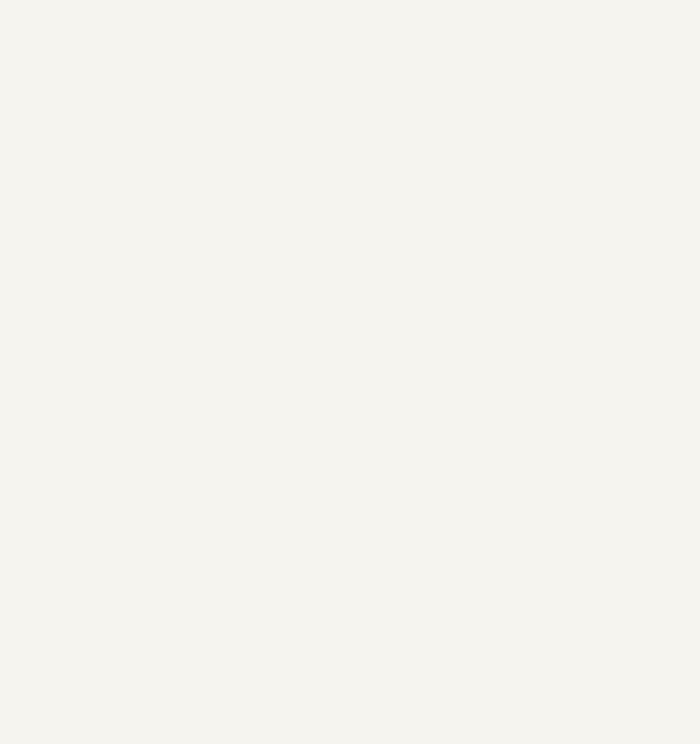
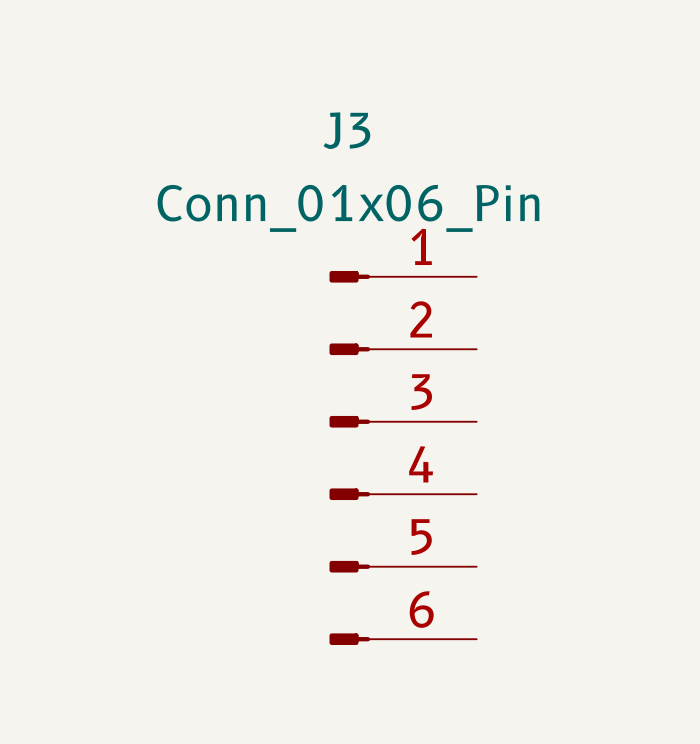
J3: none -> Conn_01x06_Pin (403, 457)

